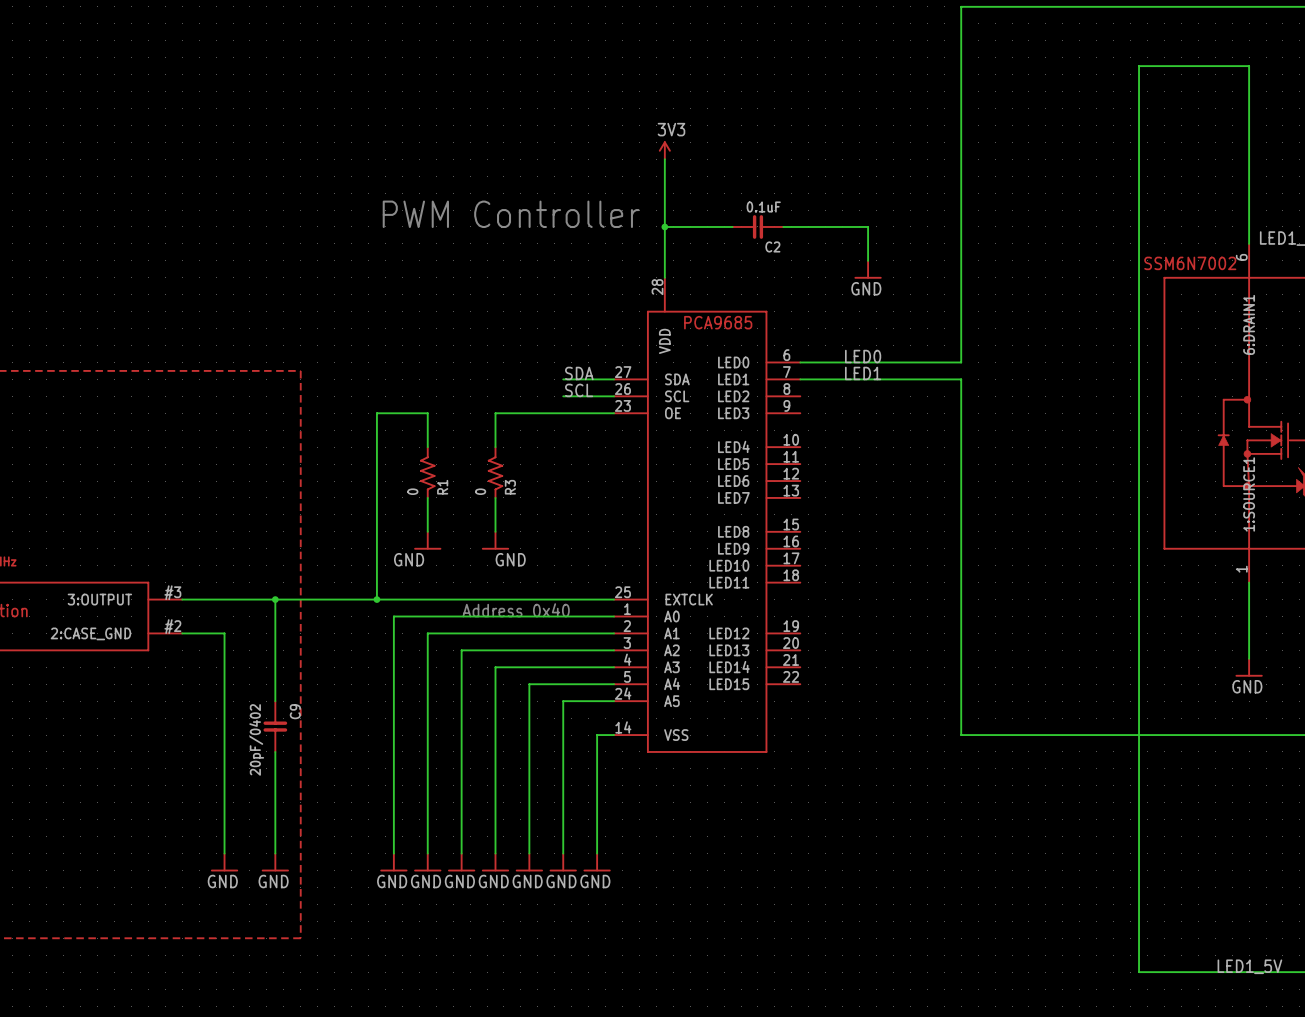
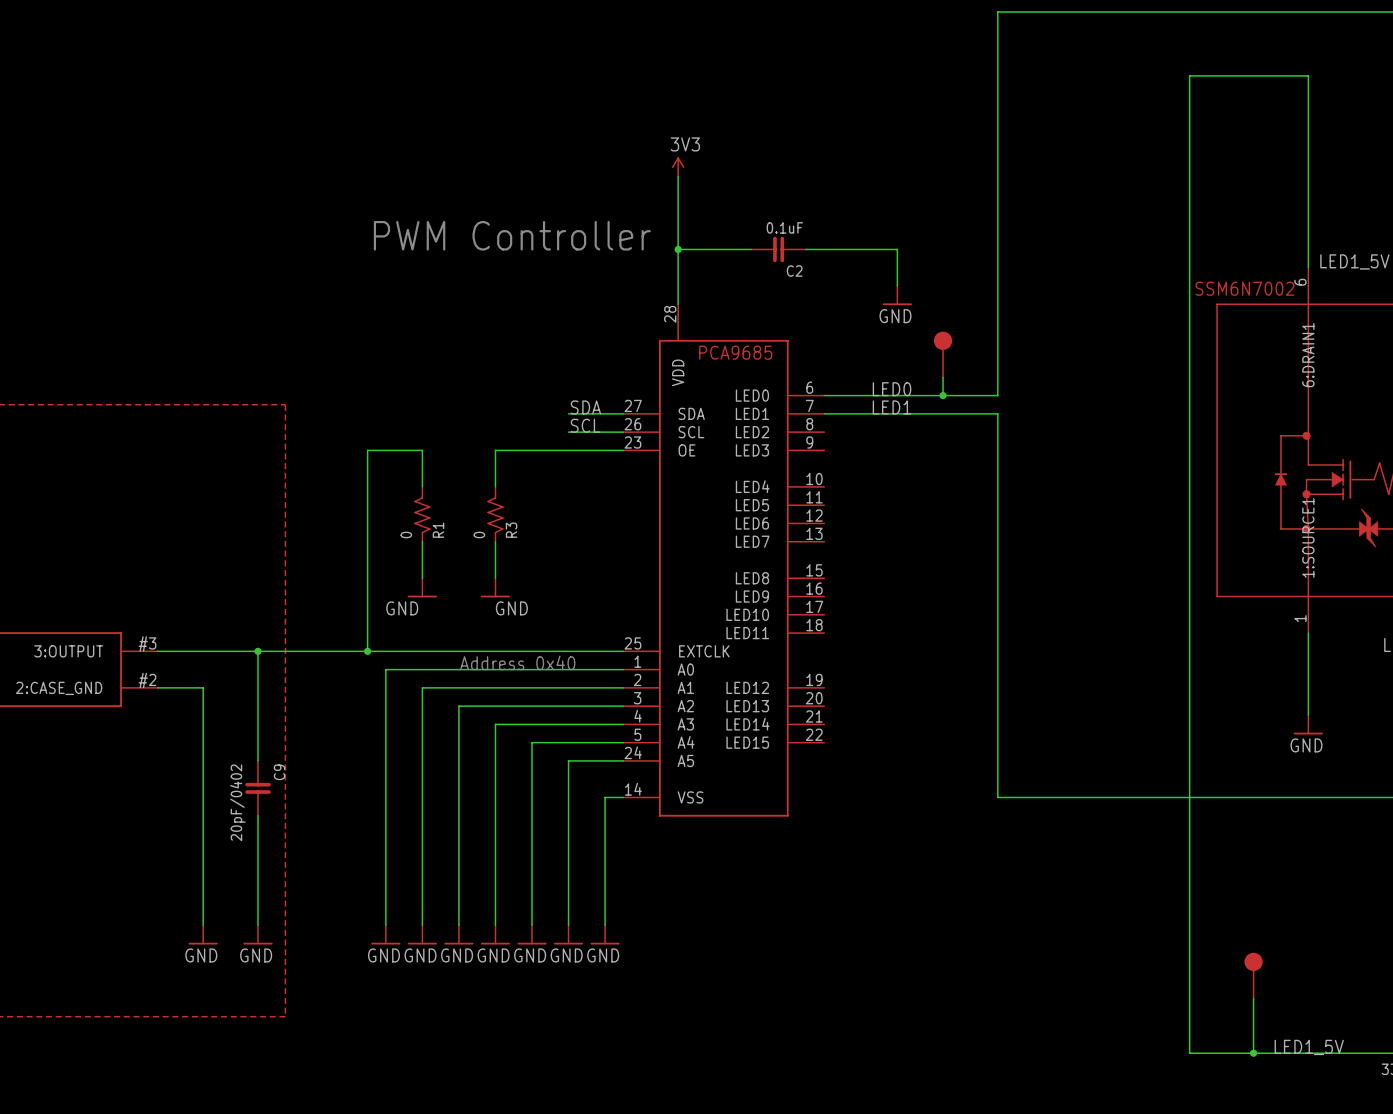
part: none -> (943, 354)
wire: none -> (943, 377) (943, 395)
junction: none -> (943, 395)
part: none -> (1253, 975)
wire: none -> (1253, 998) (1253, 1053)
junction: none -> (1253, 1053)

